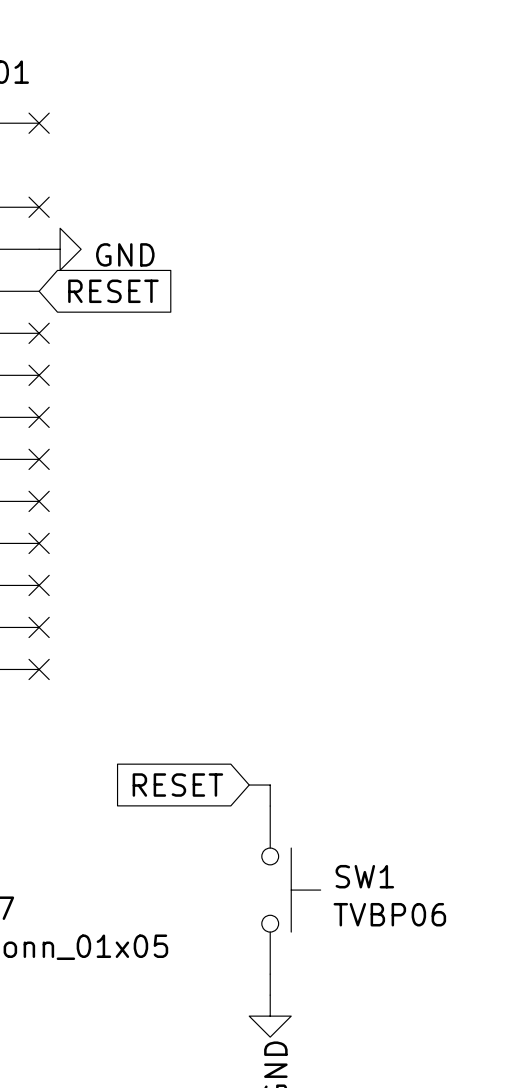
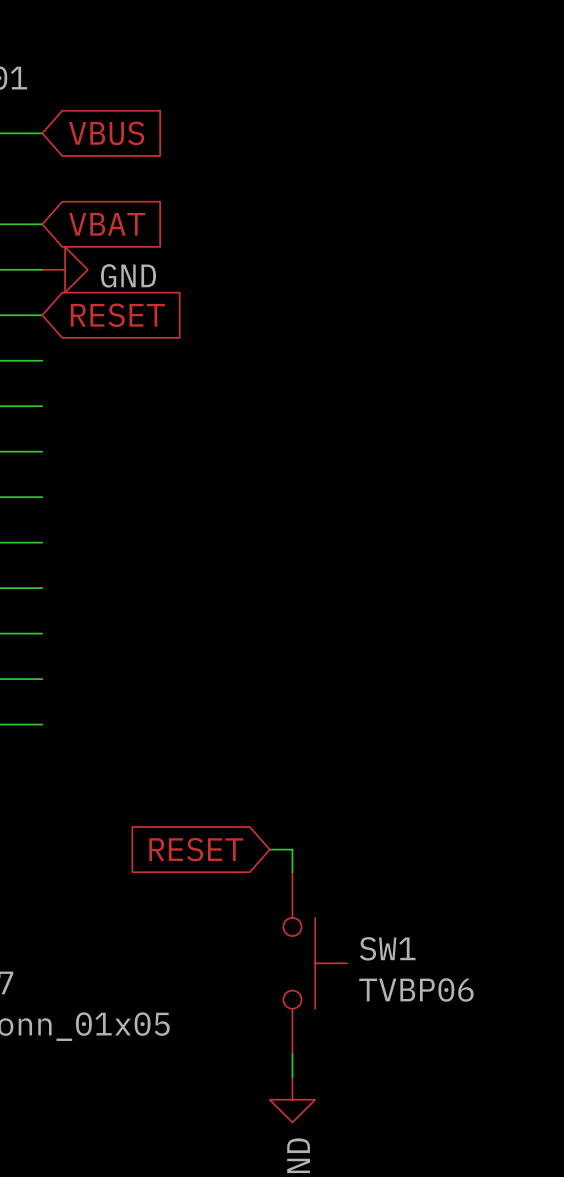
no-connect mark: (39, 123) -> none
global label: none -> VBUS (106, 133)
no-connect mark: (39, 207) -> none
global label: none -> VBAT (107, 224)
no-connect mark: (39, 333) -> none
no-connect mark: (39, 375) -> none
no-connect mark: (39, 417) -> none
no-connect mark: (39, 459) -> none
no-connect mark: (39, 501) -> none
no-connect mark: (39, 543) -> none
no-connect mark: (39, 585) -> none
no-connect mark: (39, 627) -> none
no-connect mark: (39, 669) -> none

